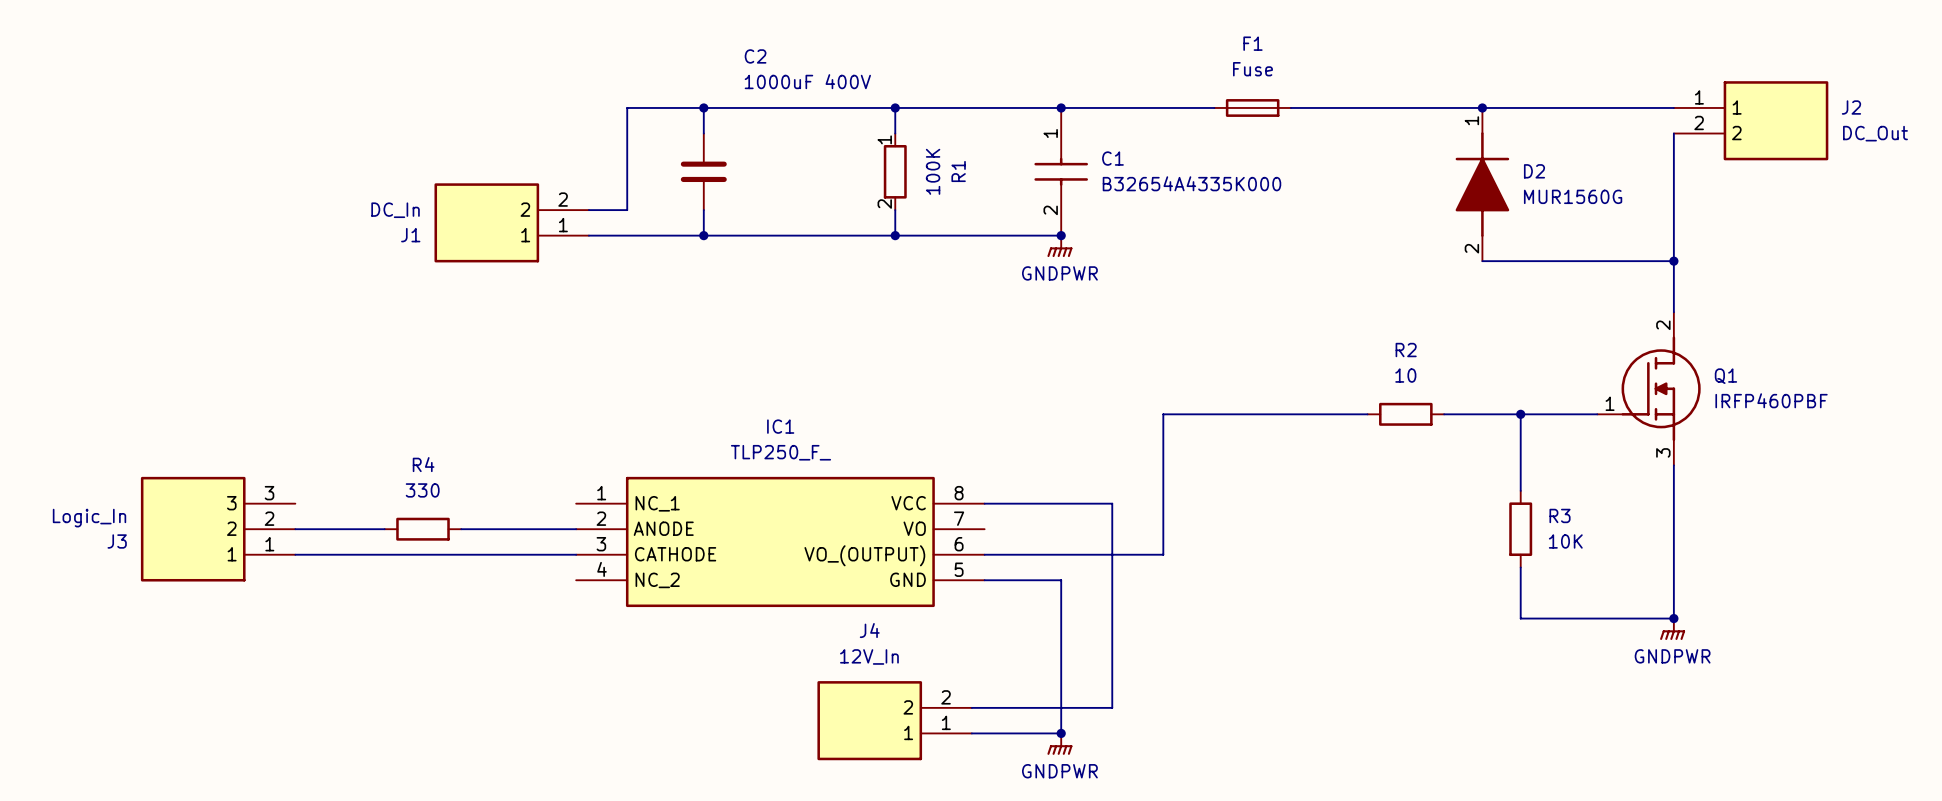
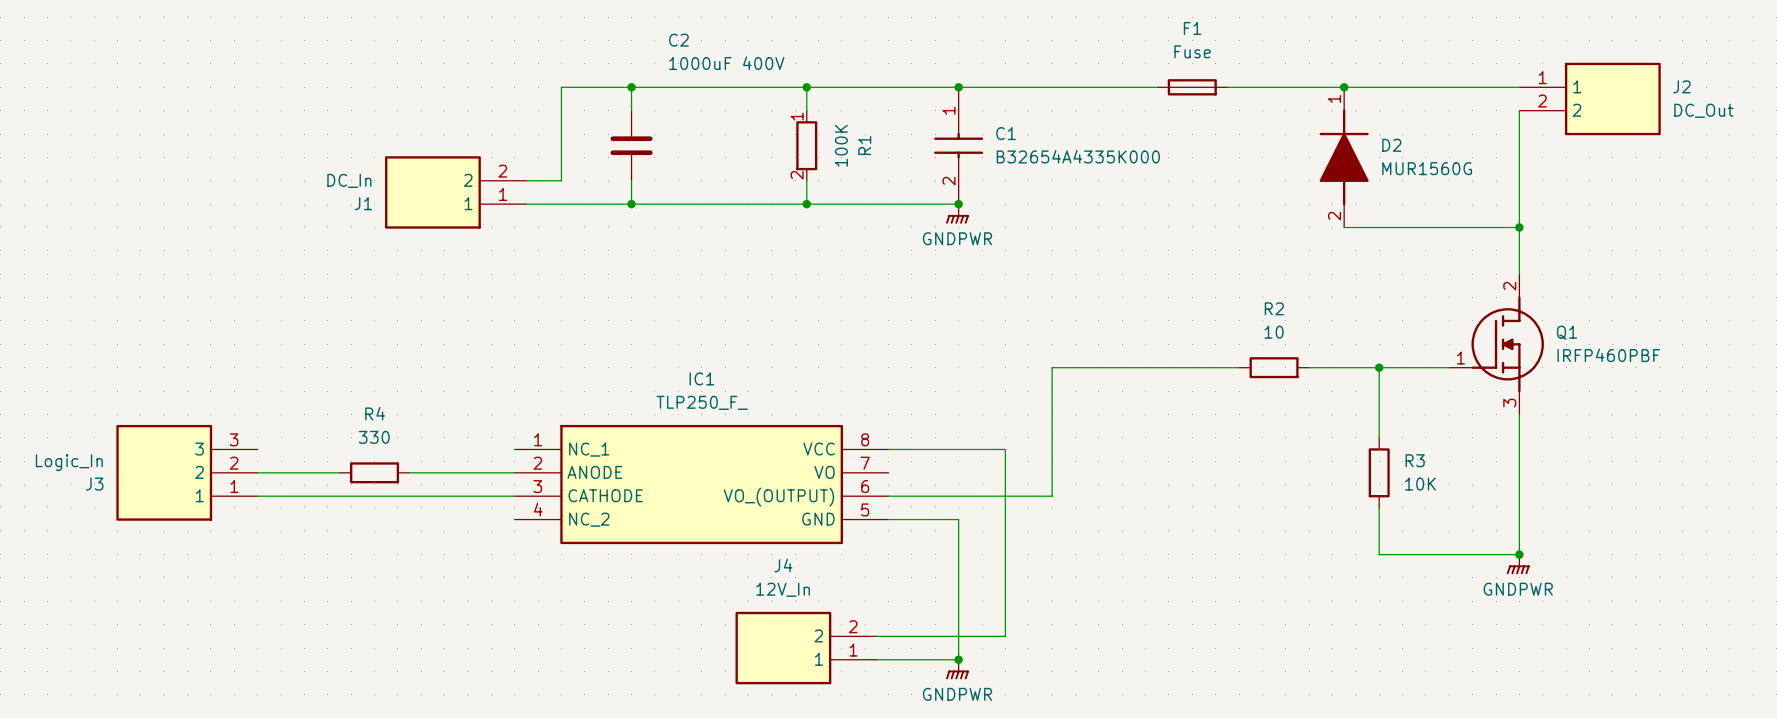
F1 position: (1252, 107) -> (1192, 87)

